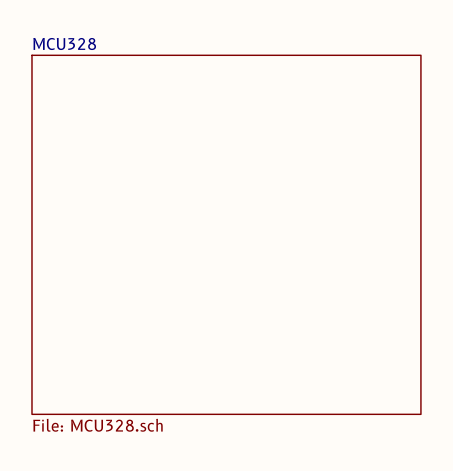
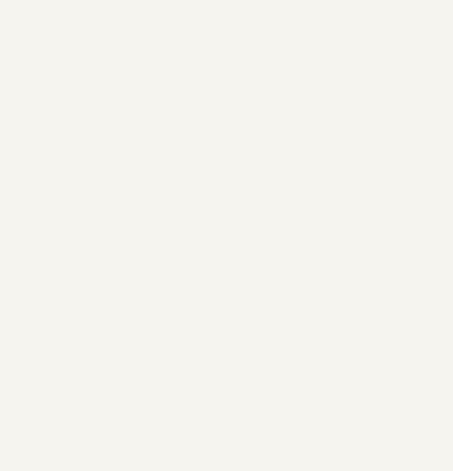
sheet MCU328: File: MCU328.sch (226, 234) -> none

